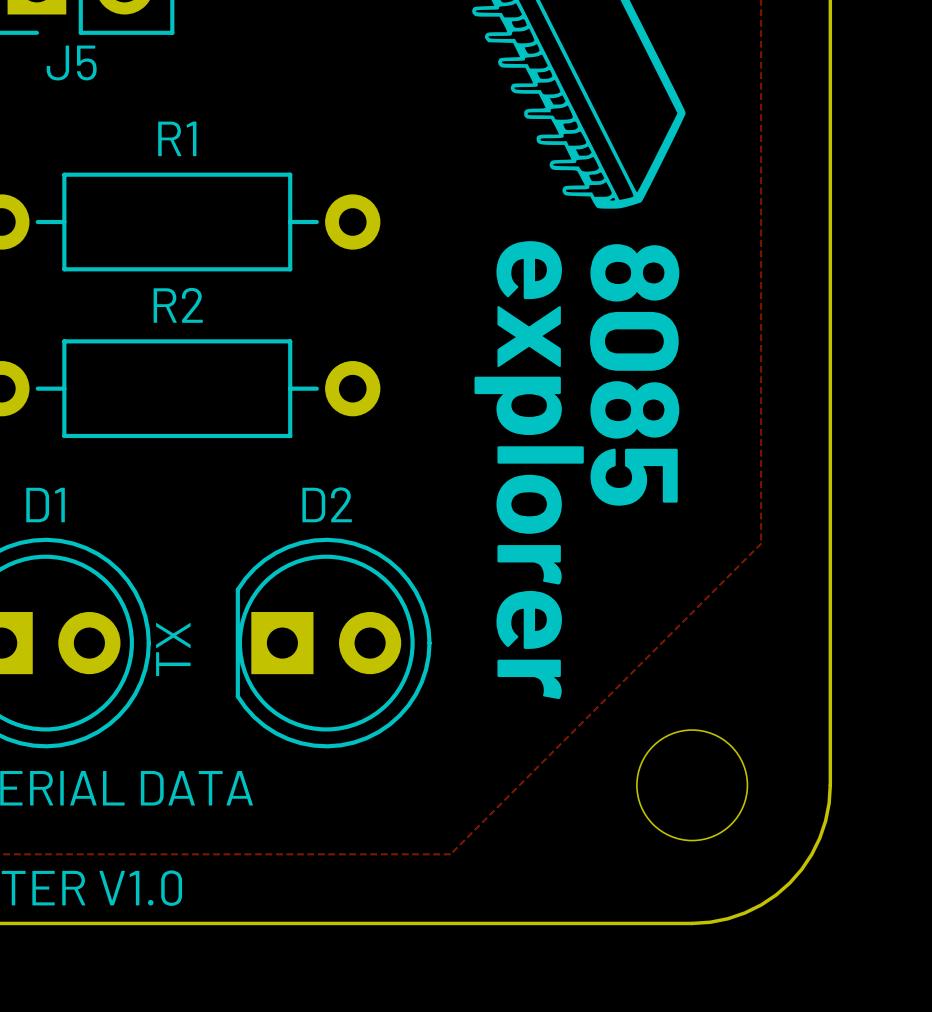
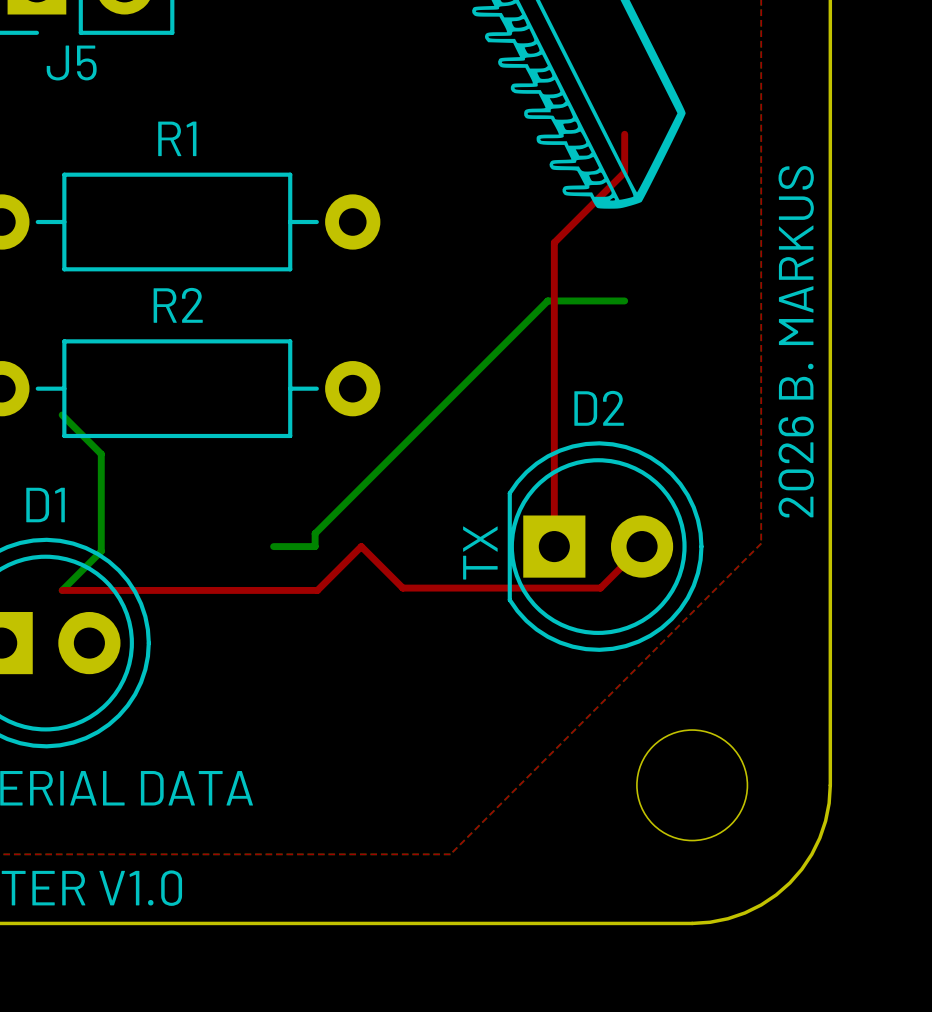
top track: none -> (624, 134) (624, 172) (554, 242) (554, 546)
bottom track: none -> (624, 300) (547, 300) (315, 533) (315, 546) (273, 546)
text: none -> 2026 B. MARKUS (796, 341)
text: 8085 (634, 374) -> none
bottom track: none -> (62, 414) (101, 454) (101, 551) (62, 590)
text: explorer (529, 470) -> none
top track: none -> (642, 546) (600, 588) (402, 588) (361, 546) (317, 590) (62, 590)
D2 position: (333, 643) -> (605, 546)
text position: TX (173, 649) -> TX (480, 552)

